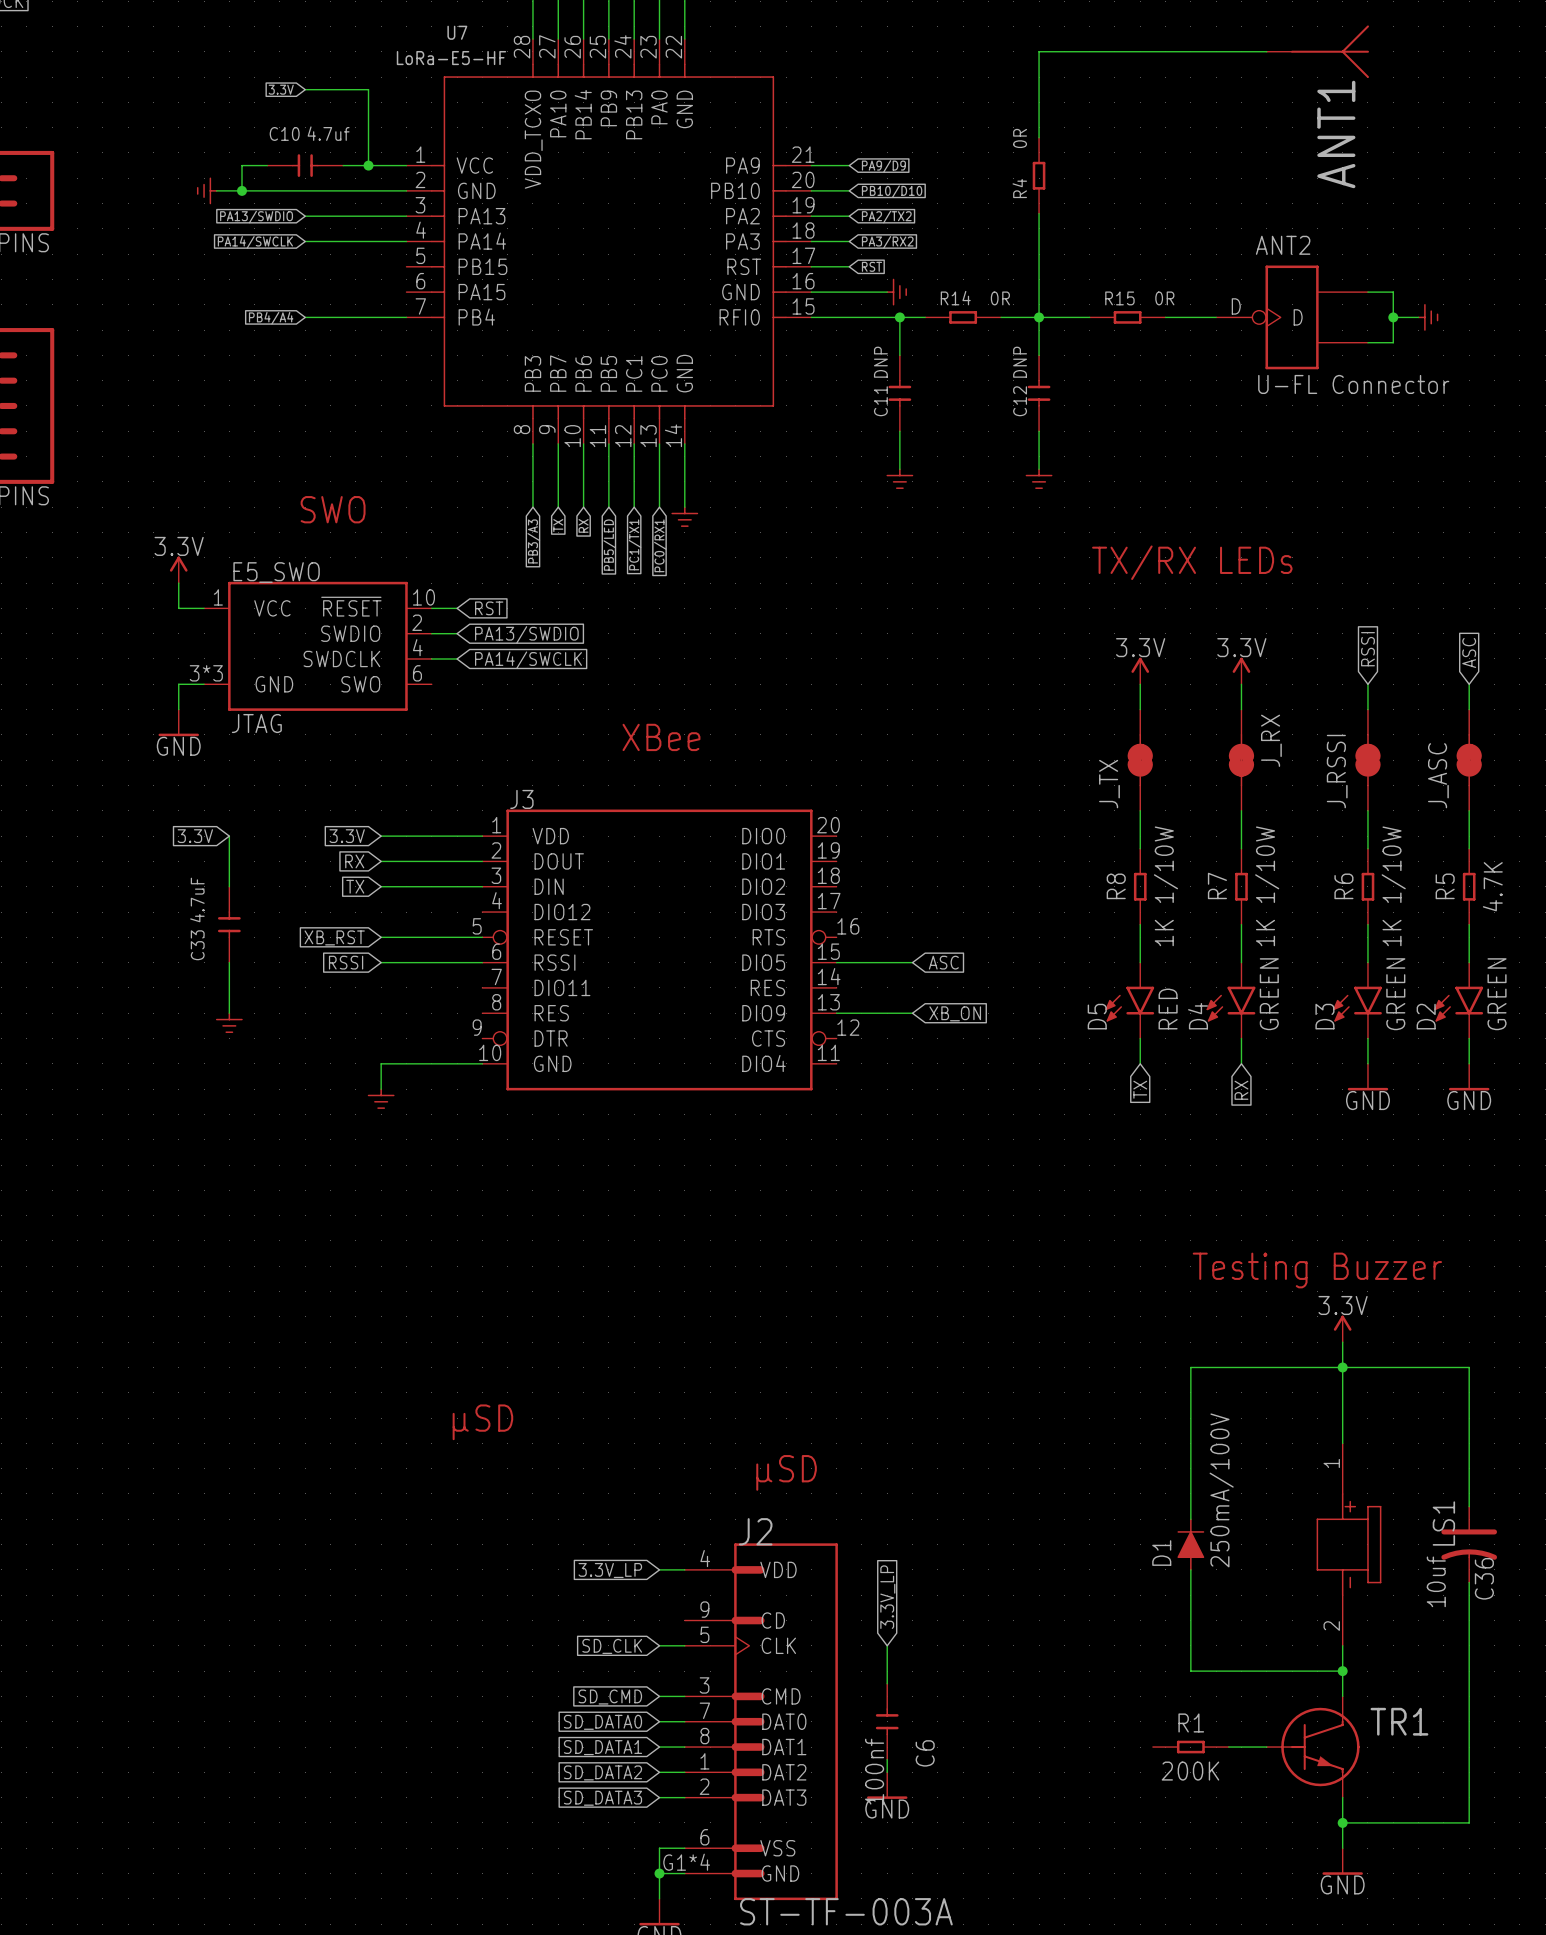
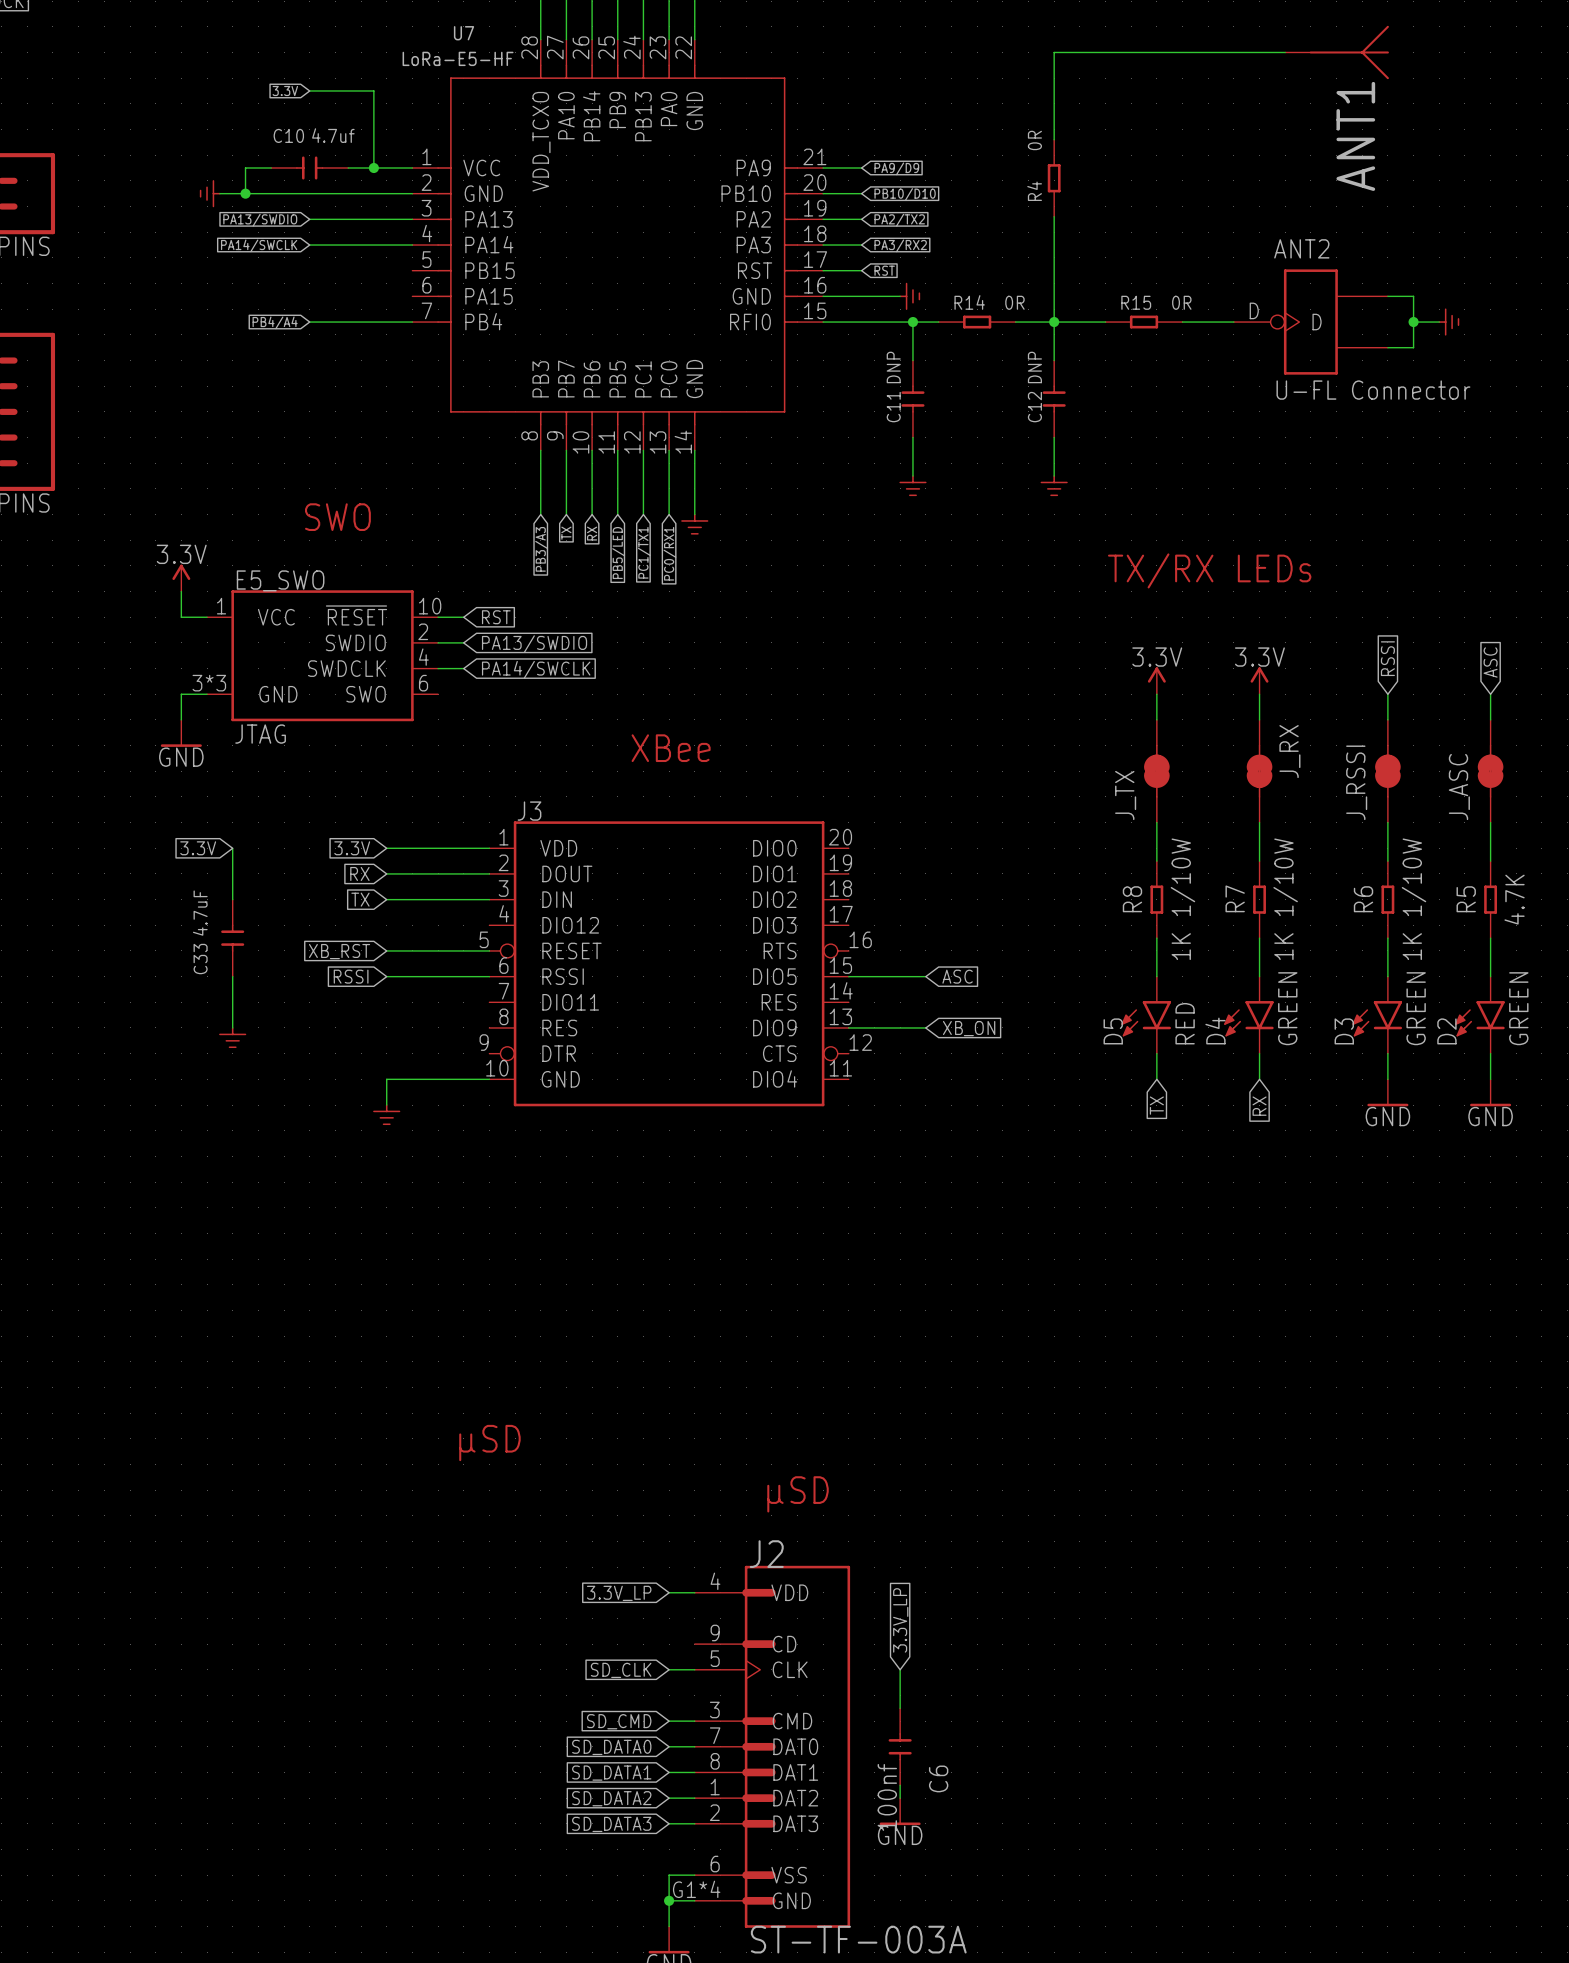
text: Testing Buzzer (1317, 1270) -> none
power symbol: 3.3V (1342, 1328) -> none
wire: (1342, 1342) (1342, 1443) -> none
junction: (1342, 1367) -> none
wire: (1469, 1506) (1469, 1367) (1190, 1367) (1190, 1519) -> none
D1: 250mA/100V (1190, 1544) -> none
LS1: (1349, 1544) -> none
C36: 10uf (1469, 1544) -> none
wire: (1190, 1569) (1190, 1671) (1342, 1671) -> none
wire: (1469, 1582) (1469, 1822) (1342, 1822) -> none
wire: (1342, 1645) (1342, 1696) -> none
junction: (1342, 1671) -> none
R1: 200K (1190, 1747) -> none
wire: (1228, 1747) (1266, 1747) -> none
TR1: (1313, 1747) -> none
wire: (1342, 1797) (1342, 1848) -> none
junction: (1342, 1822) -> none
power symbol: GND (1342, 1861) -> none

